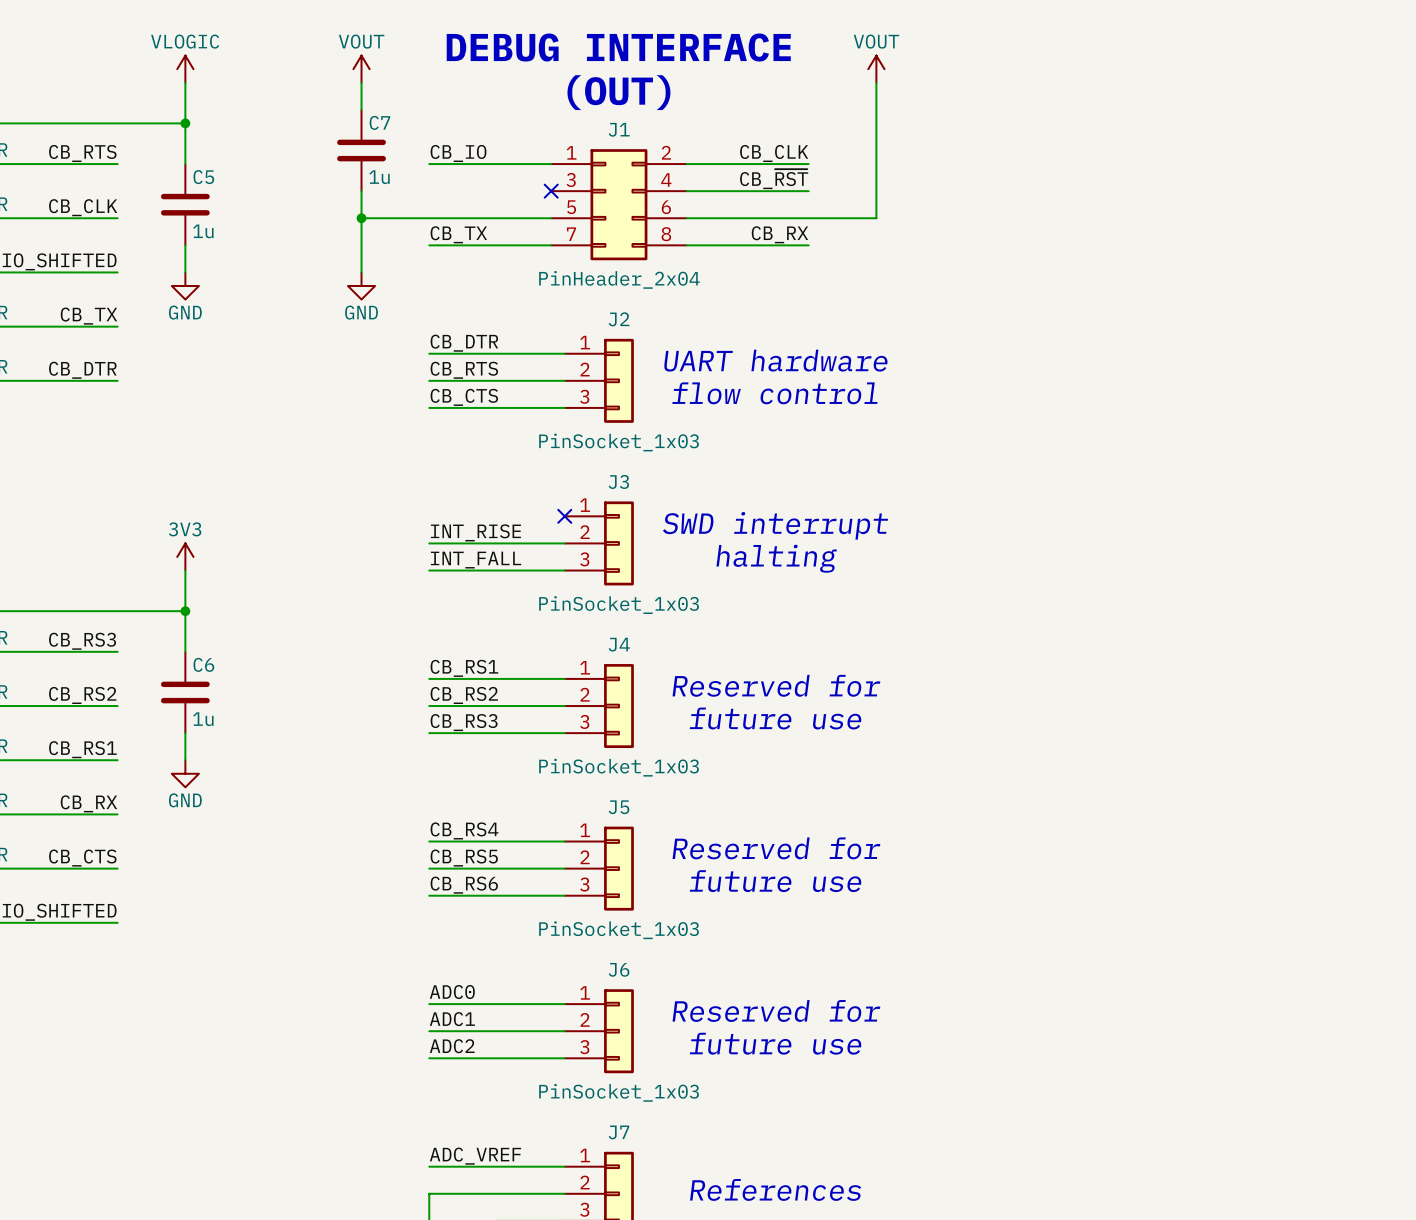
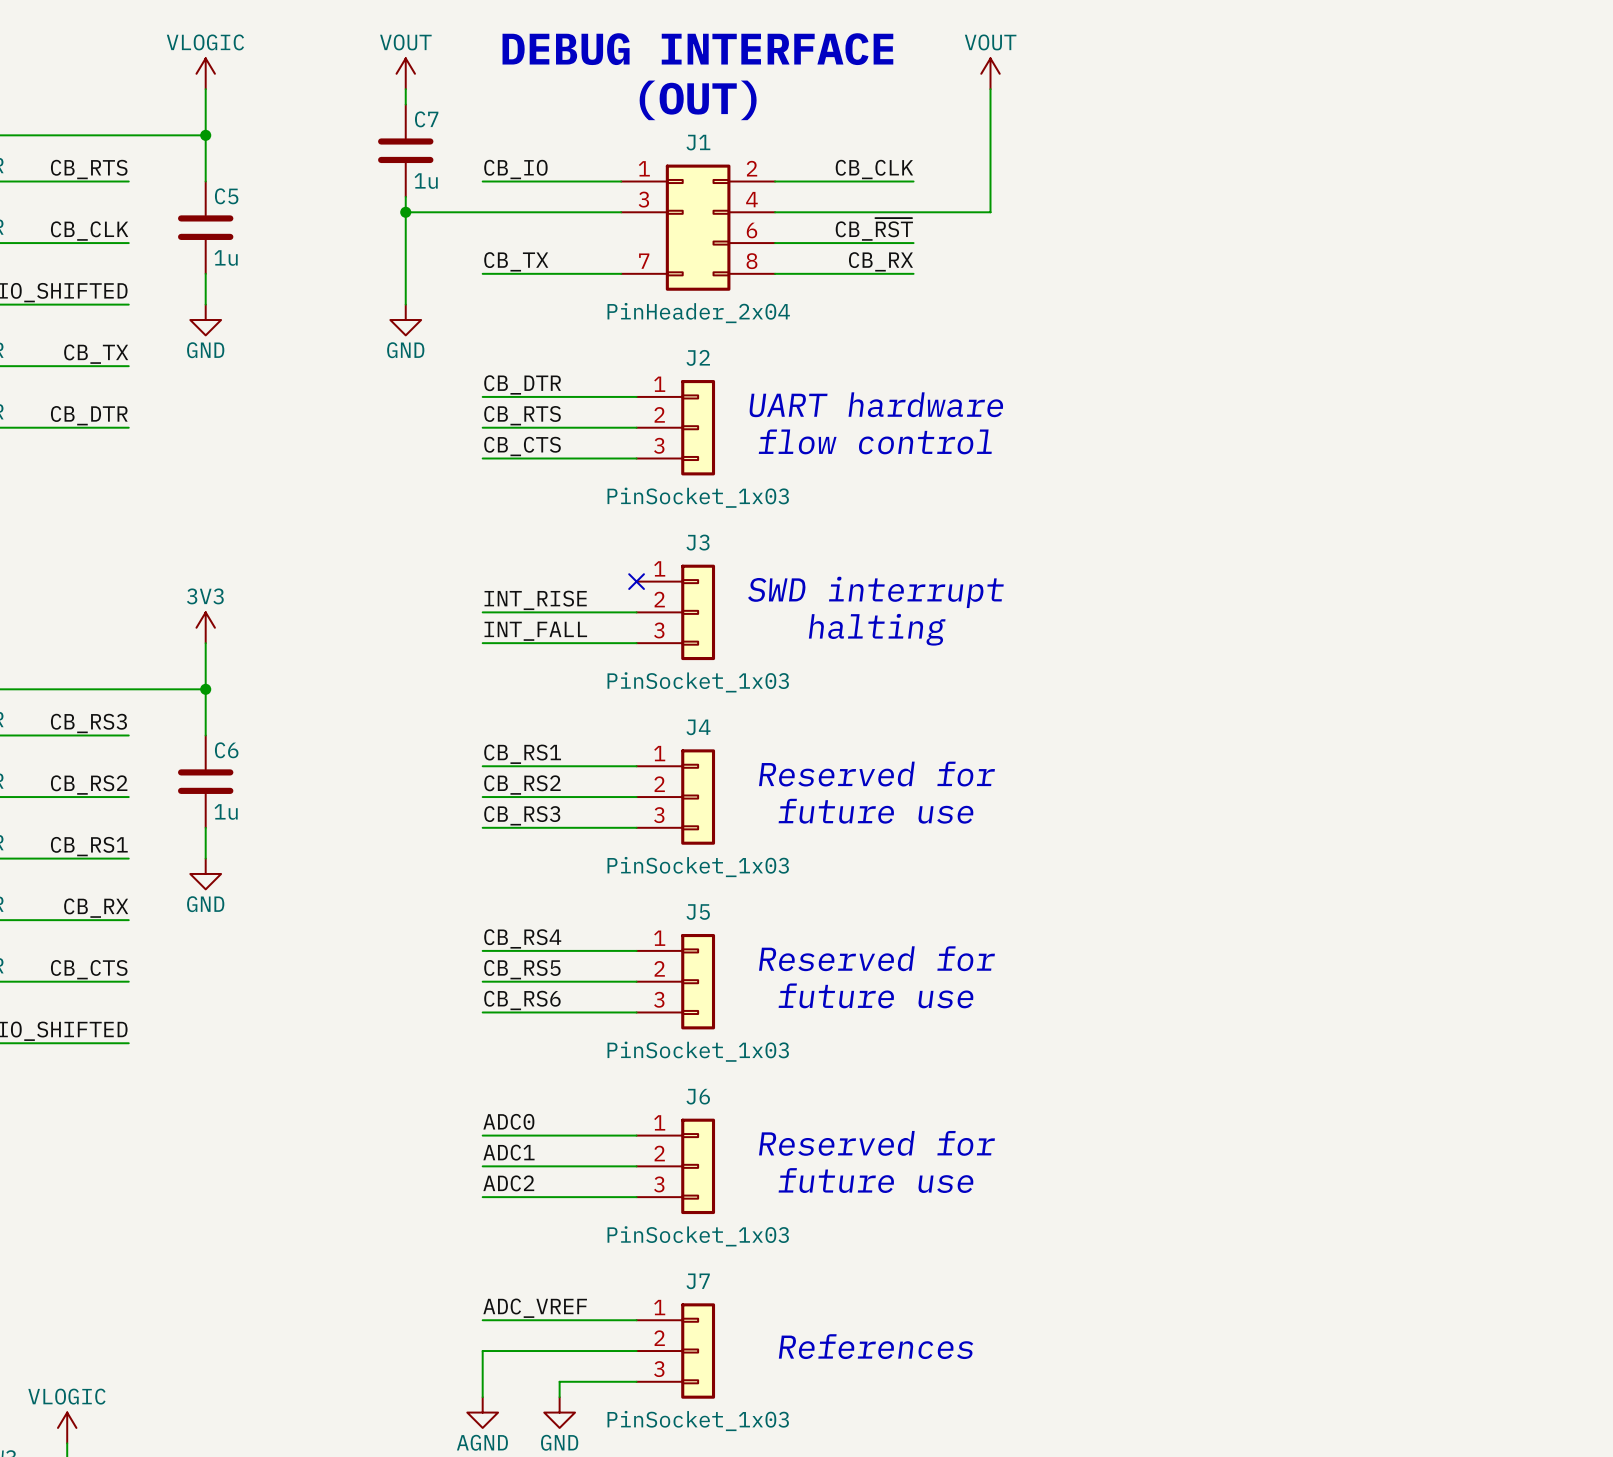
J1 symbol: [551, 149, 687, 261] -> [621, 164, 776, 291]
C7 position: (361, 150) -> (405, 150)
wire: none -> (405, 196) (405, 212) (621, 212)
label position: CB_~{RST} (774, 179) -> CB_~{RST} (874, 229)
no-connect mark: (551, 191) -> none
wire: (876, 191) (876, 218) (808, 218) -> (990, 212) (913, 212)
wire: (361, 218) (551, 218) -> none
junction position: (361, 218) -> (405, 212)

